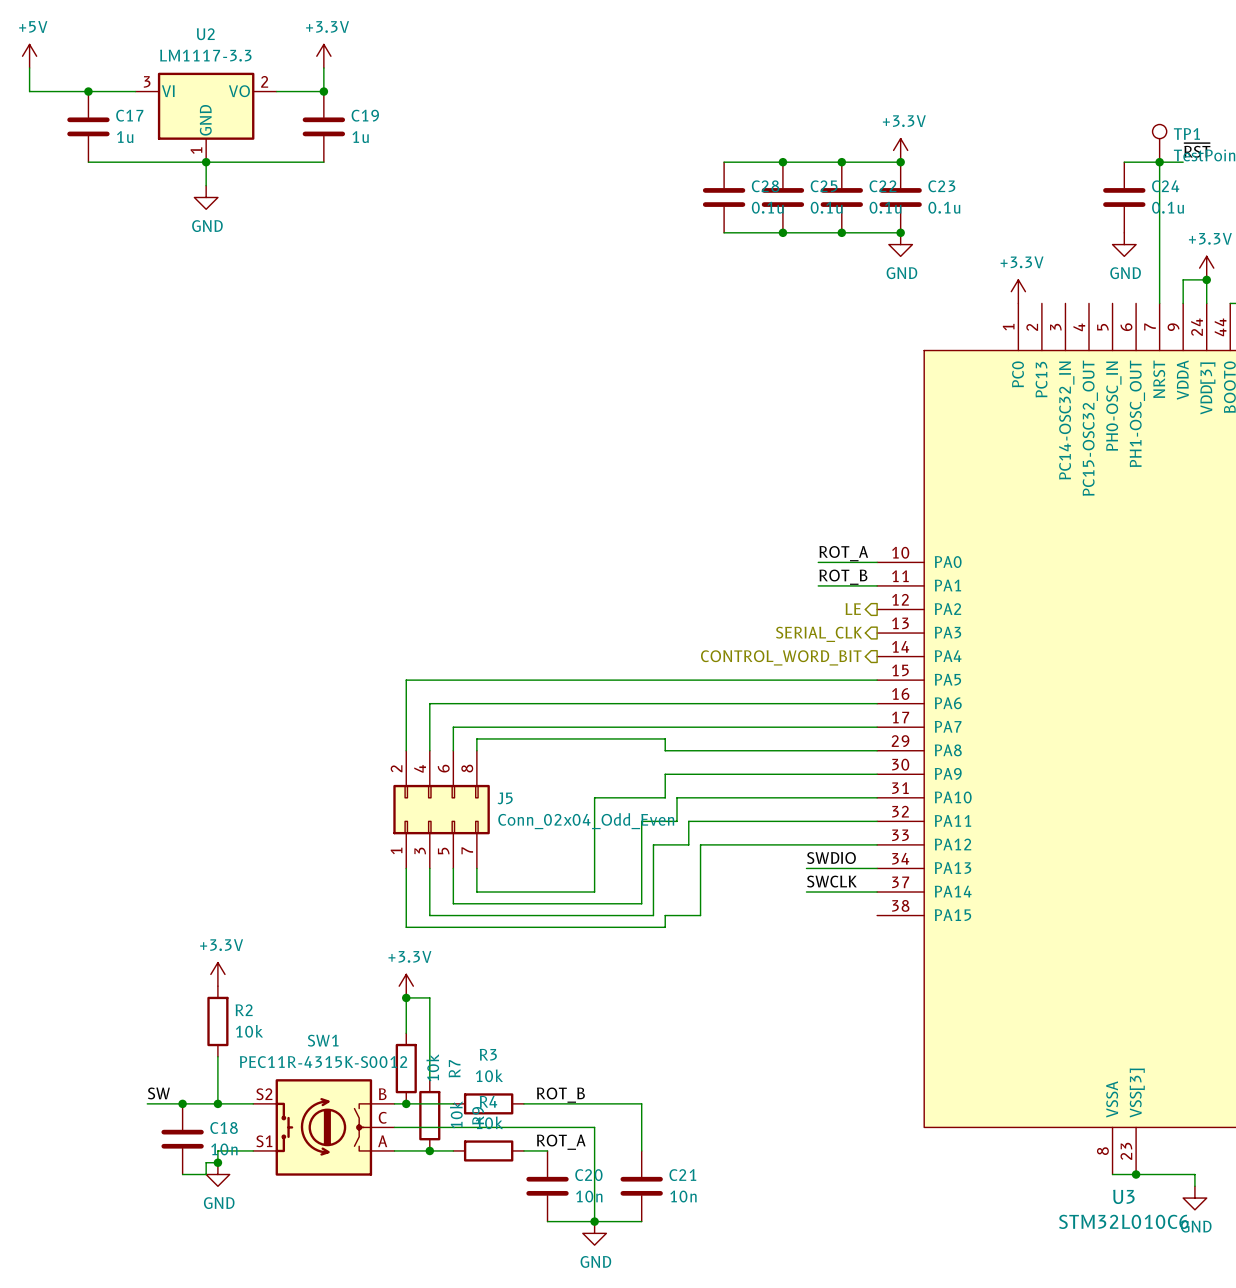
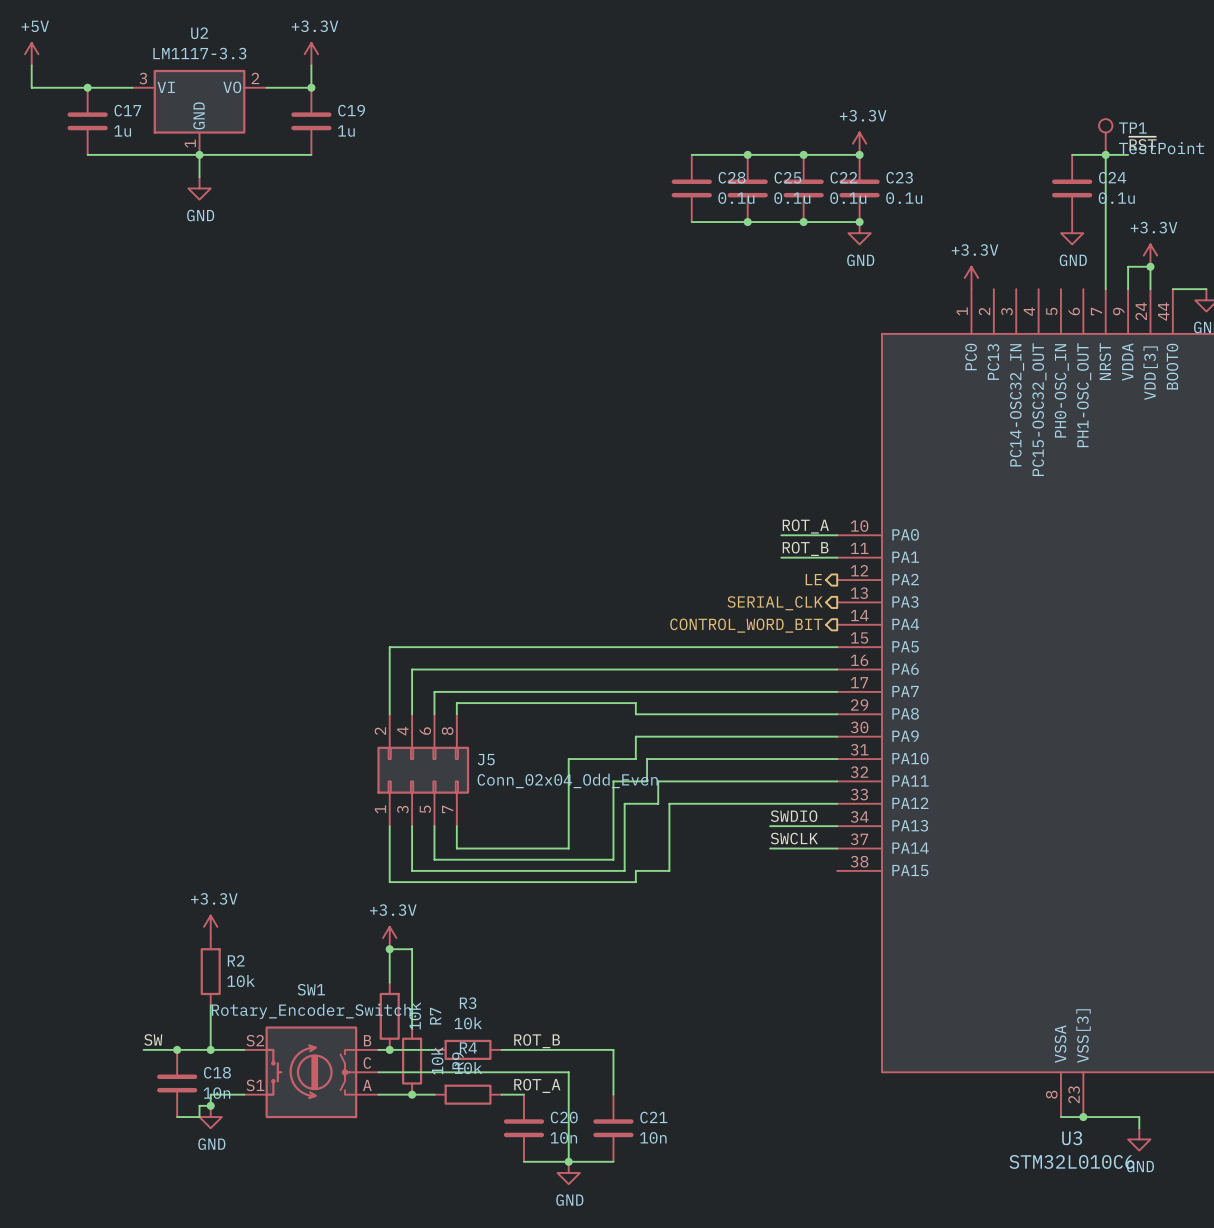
SW1 value: PEC11R-4315K-S0012 (323, 1062) -> Rotary_Encoder_Switch (311, 1011)

